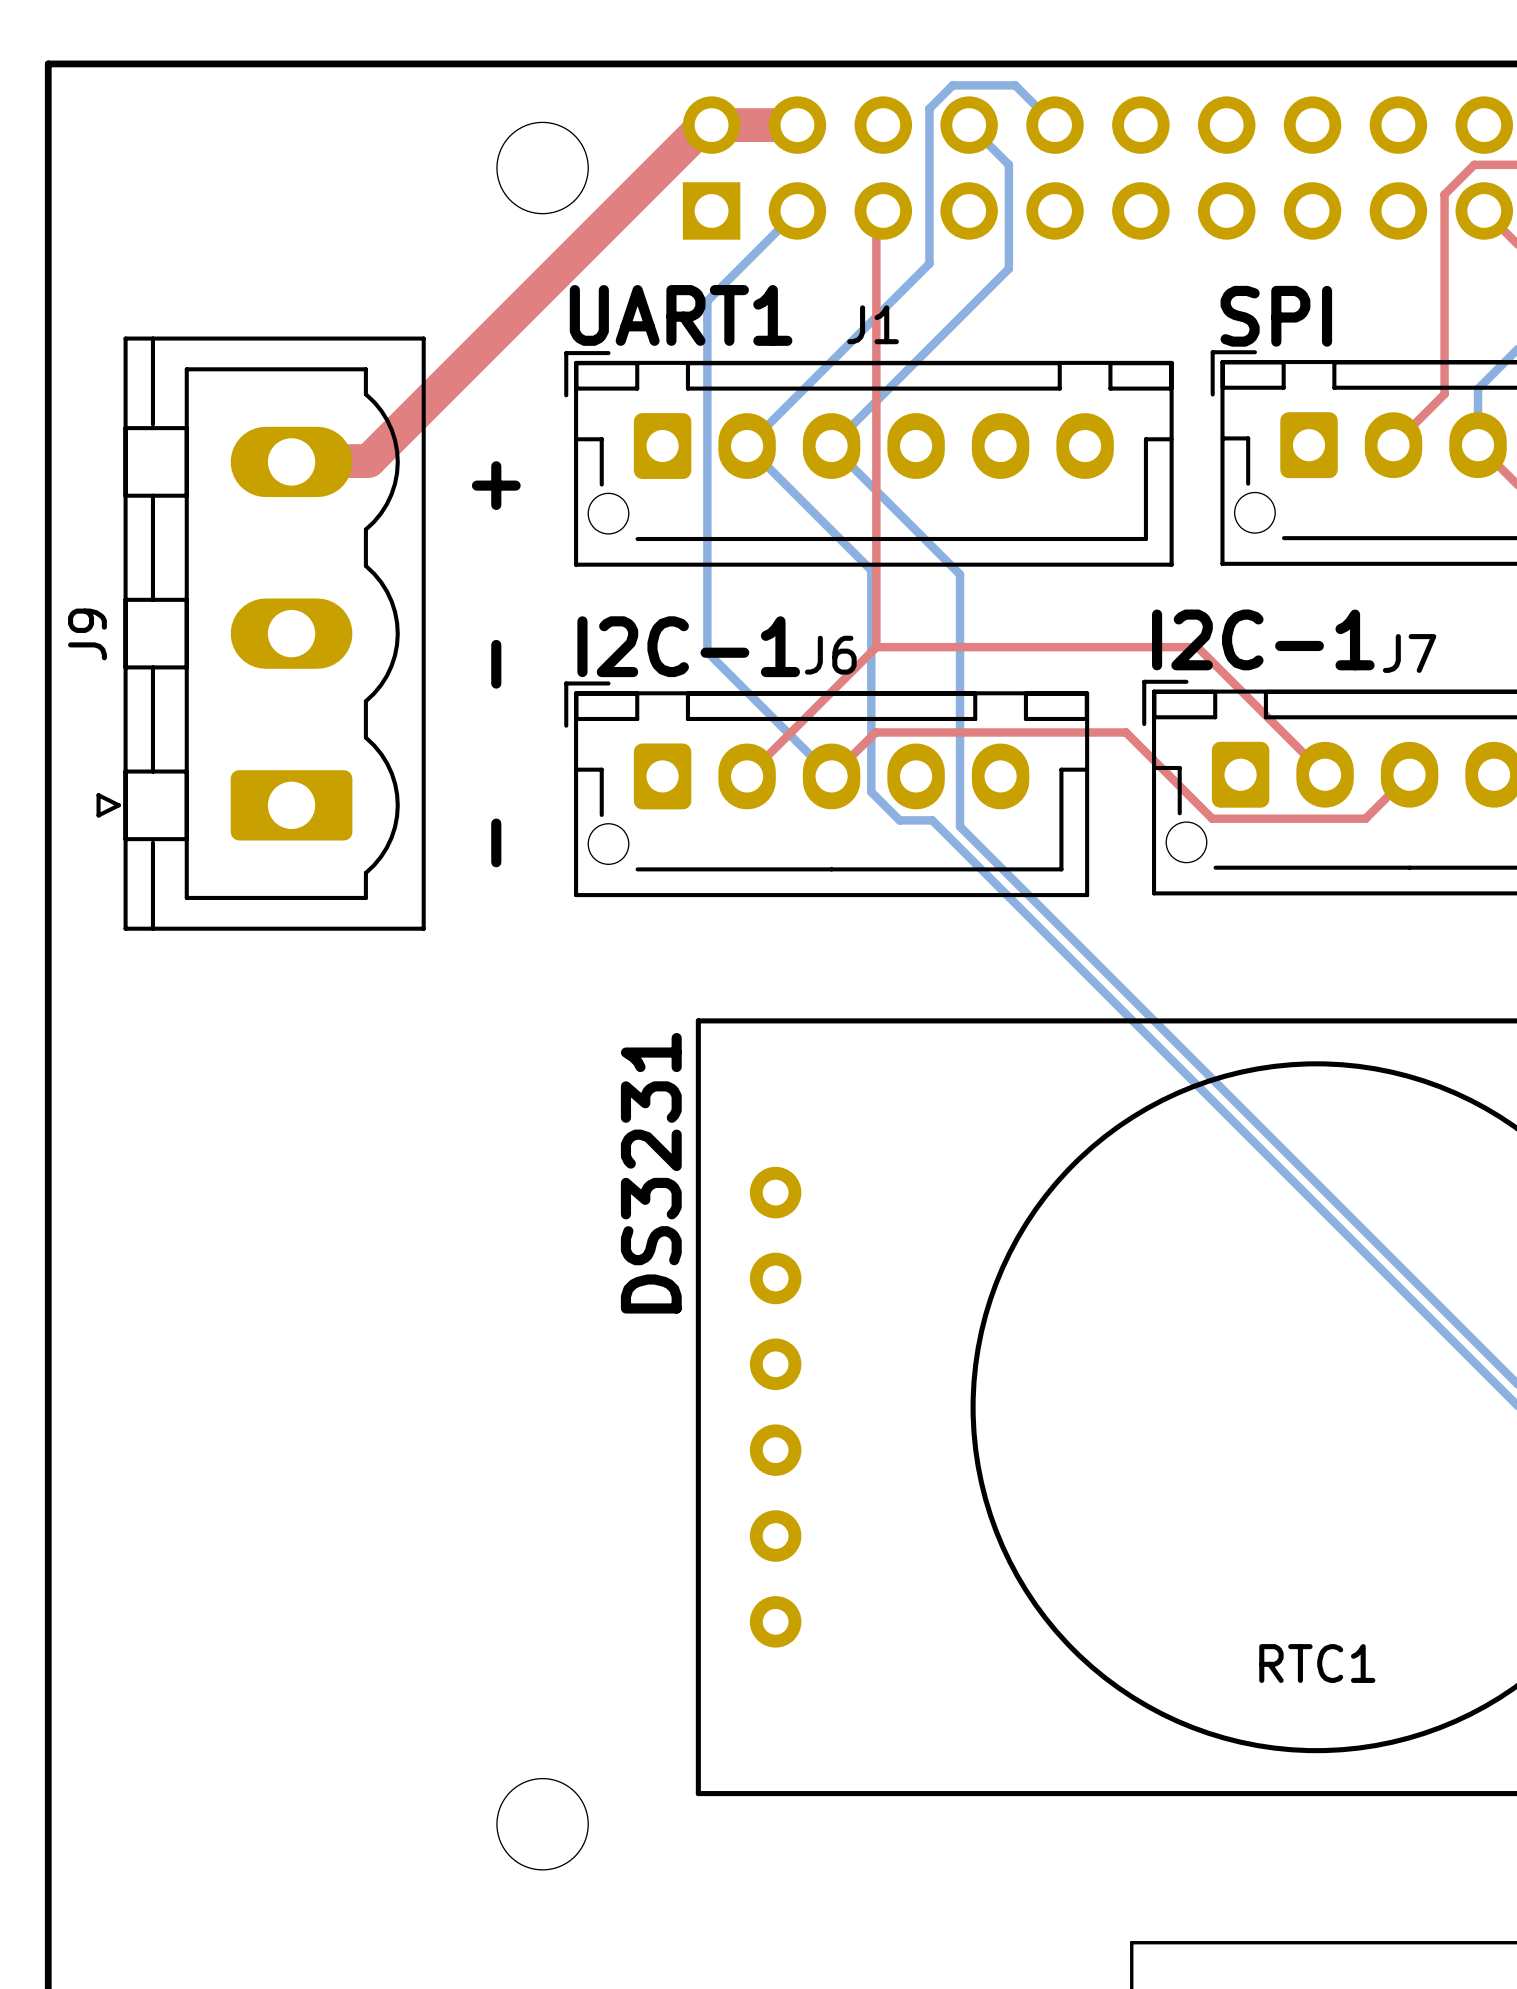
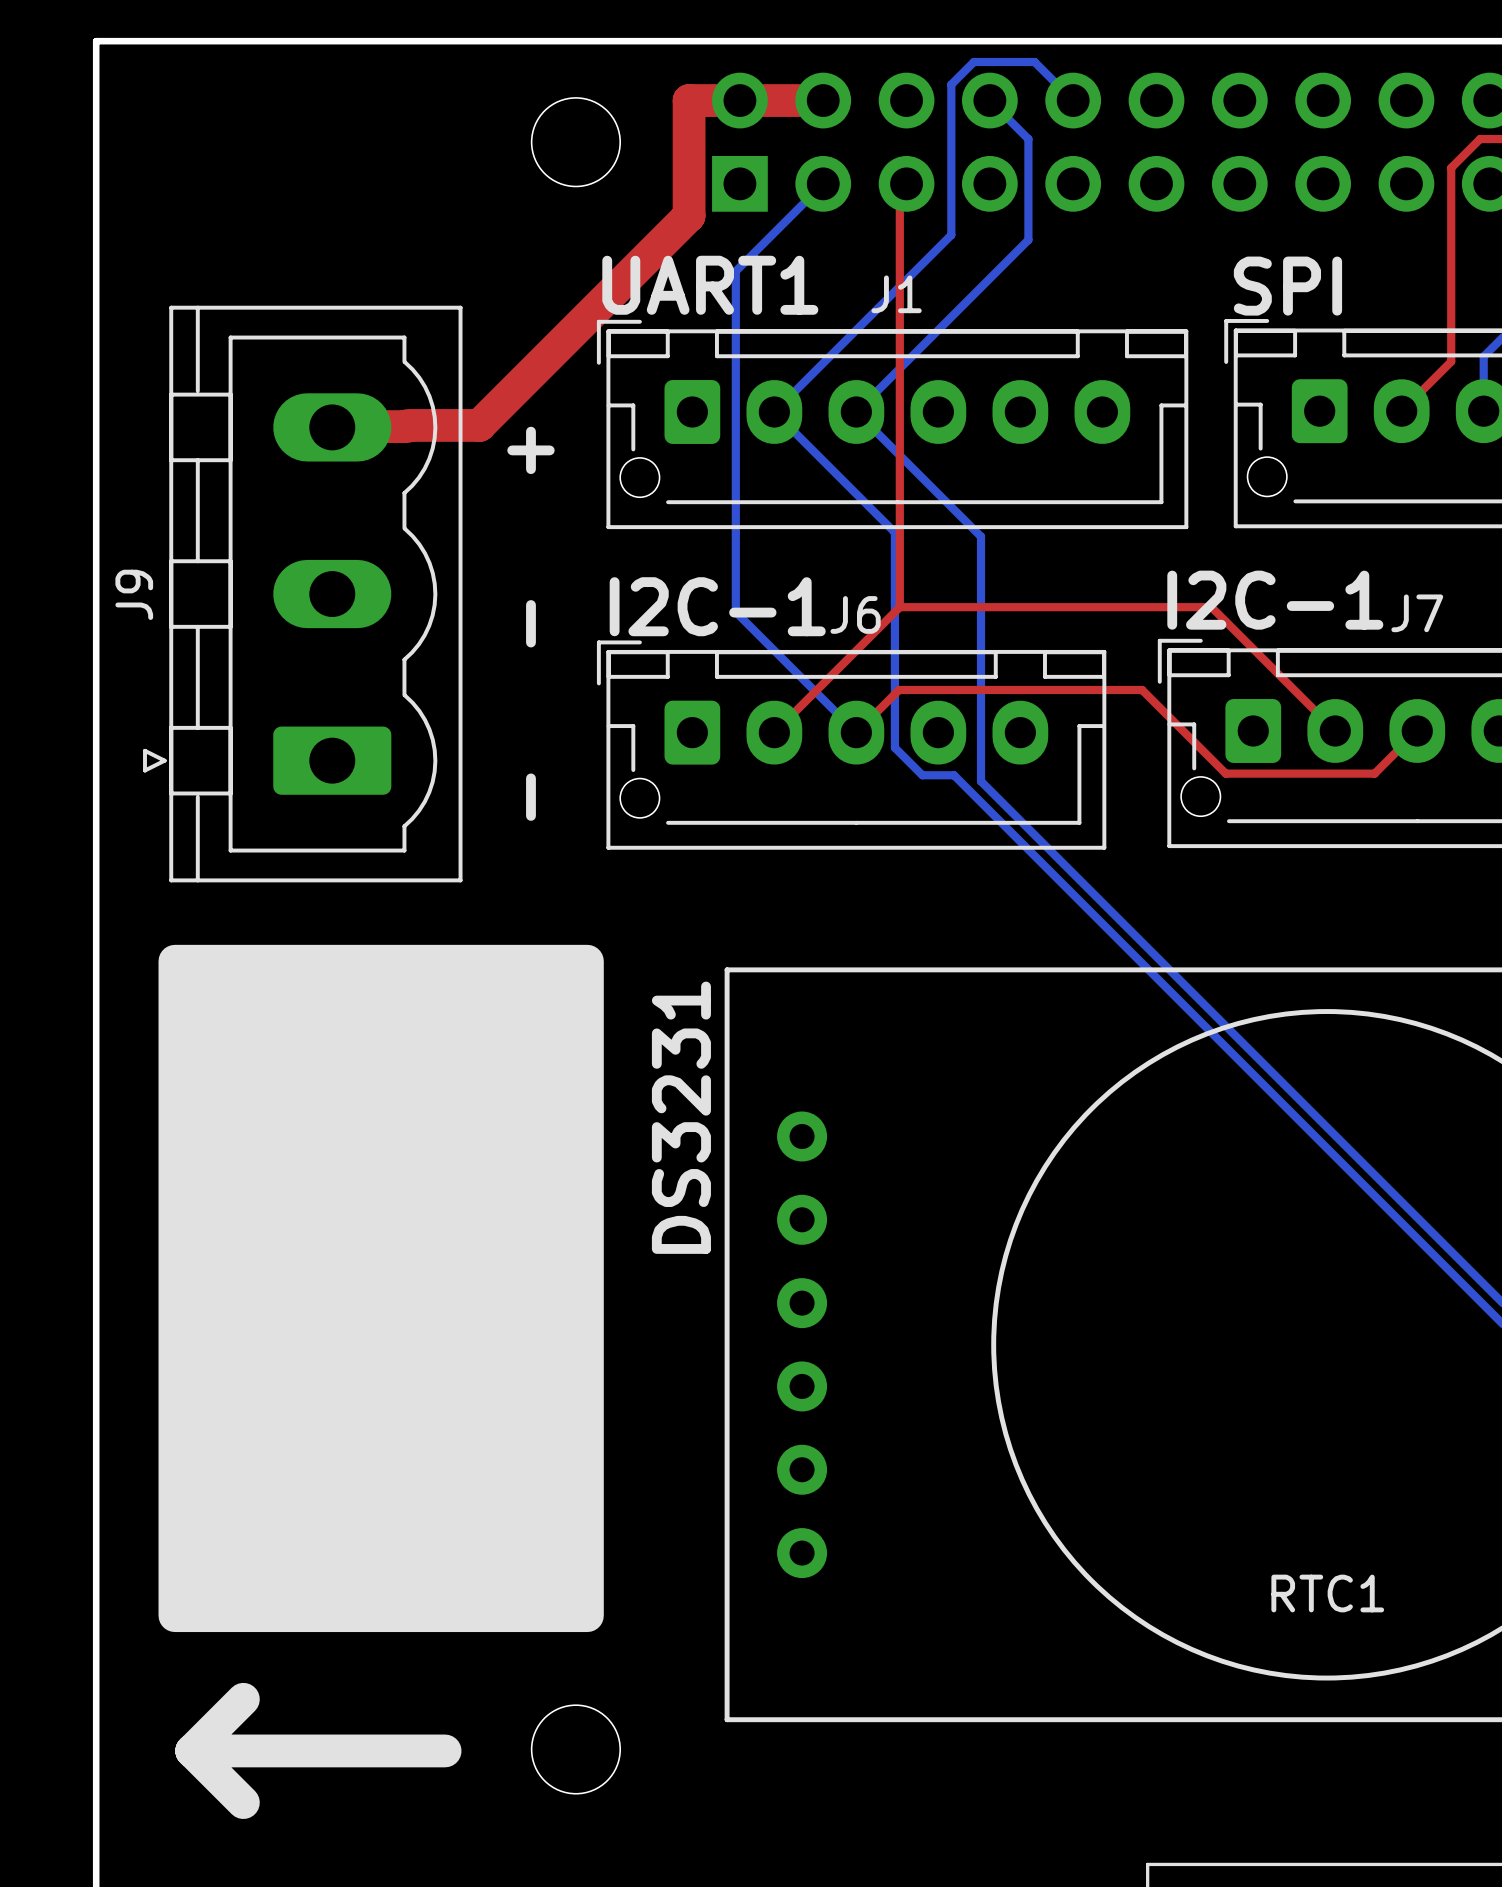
top track: (706, 123) (369, 459) -> (735, 98) (735, 100) (689, 100) (689, 215) (479, 425) (408, 425)
drawing: none -> [158, 944, 604, 1633]
line: none -> (243, 1699) (191, 1750)
line: none -> (191, 1750) (243, 1802)
line: none -> (191, 1750) (445, 1750)

